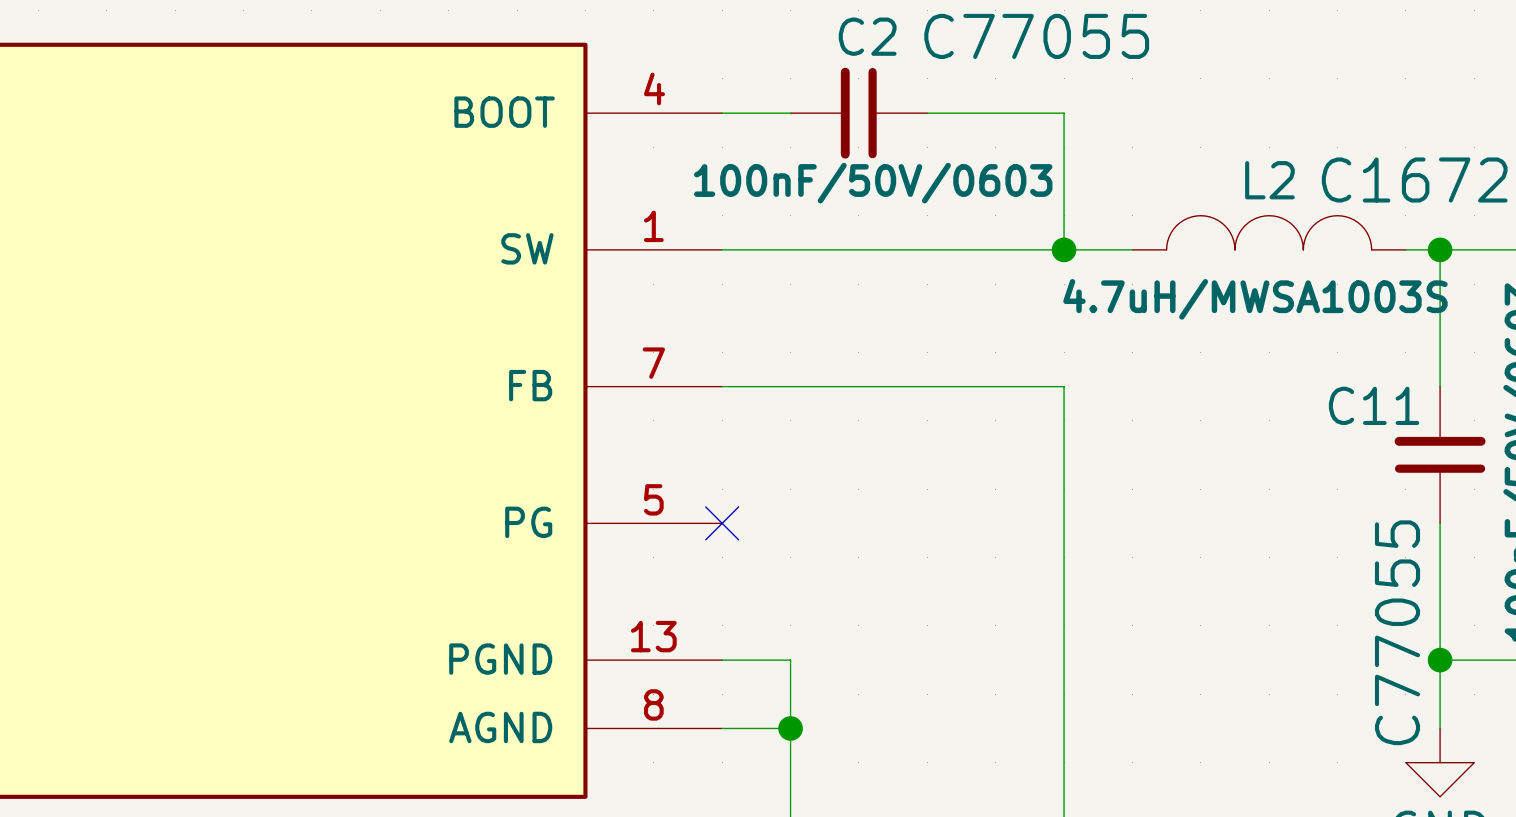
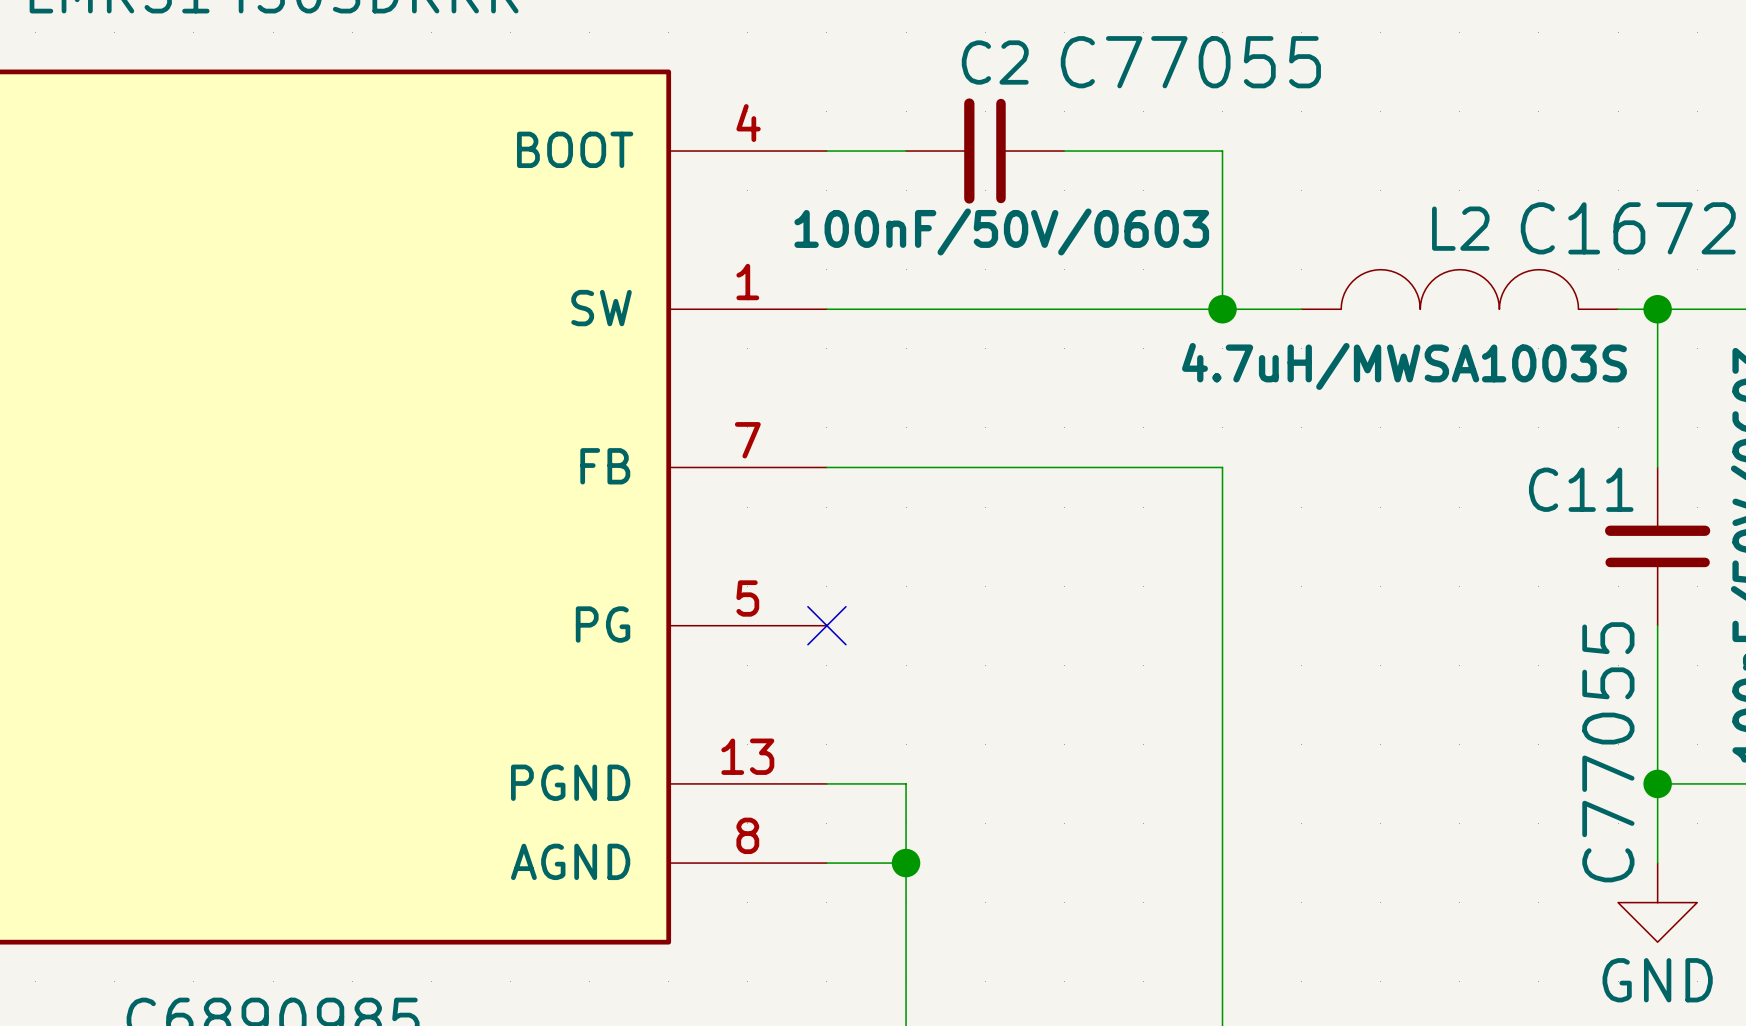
L2 value position: 4.7uH/MWSA1003S (1255, 299) -> 4.7uH/MWSA1003S (1404, 366)

